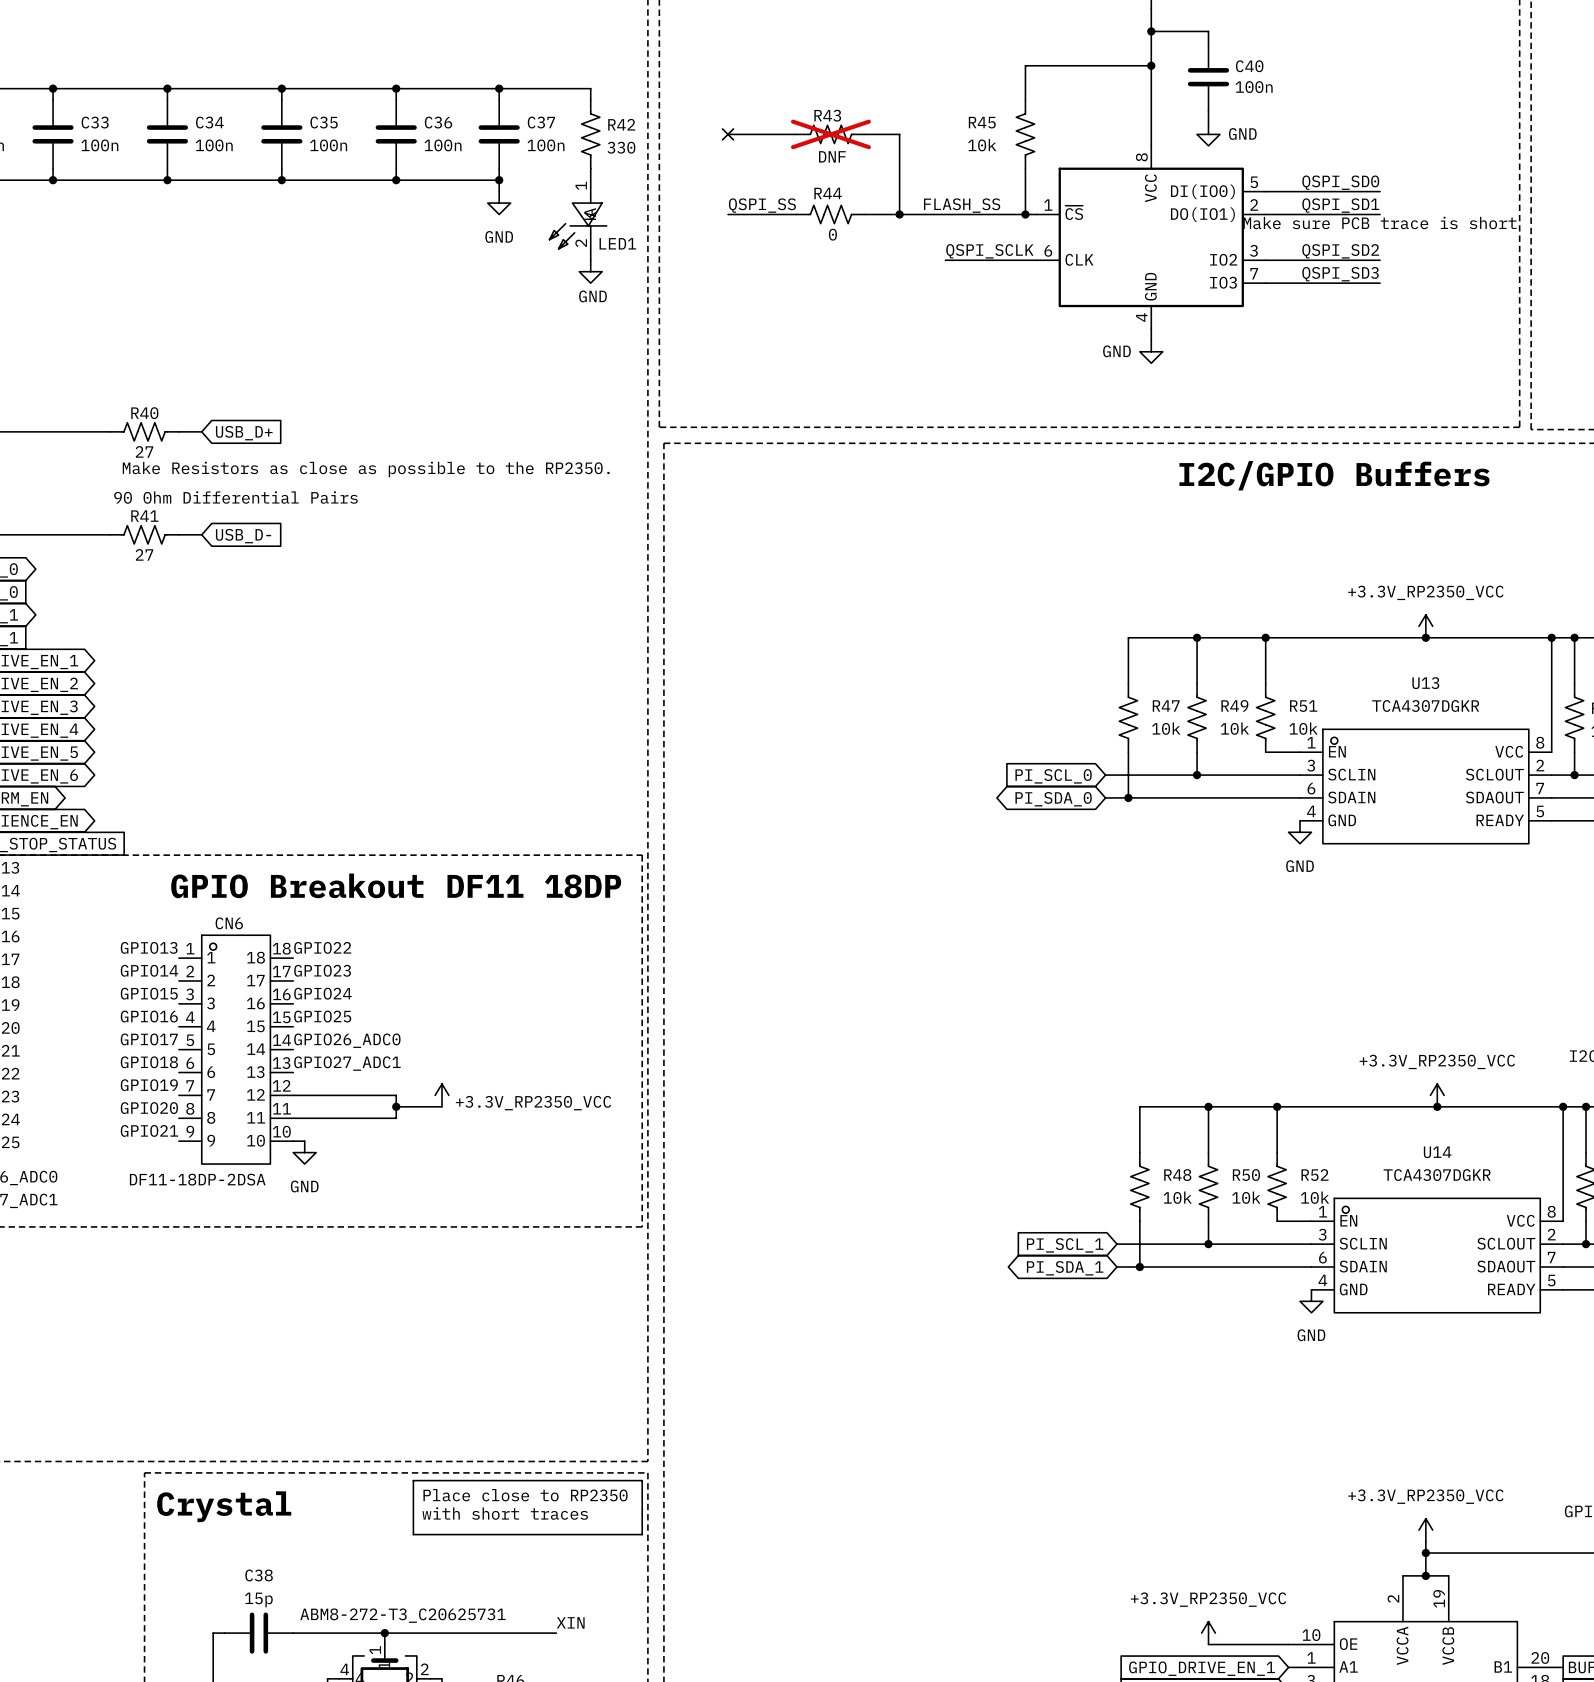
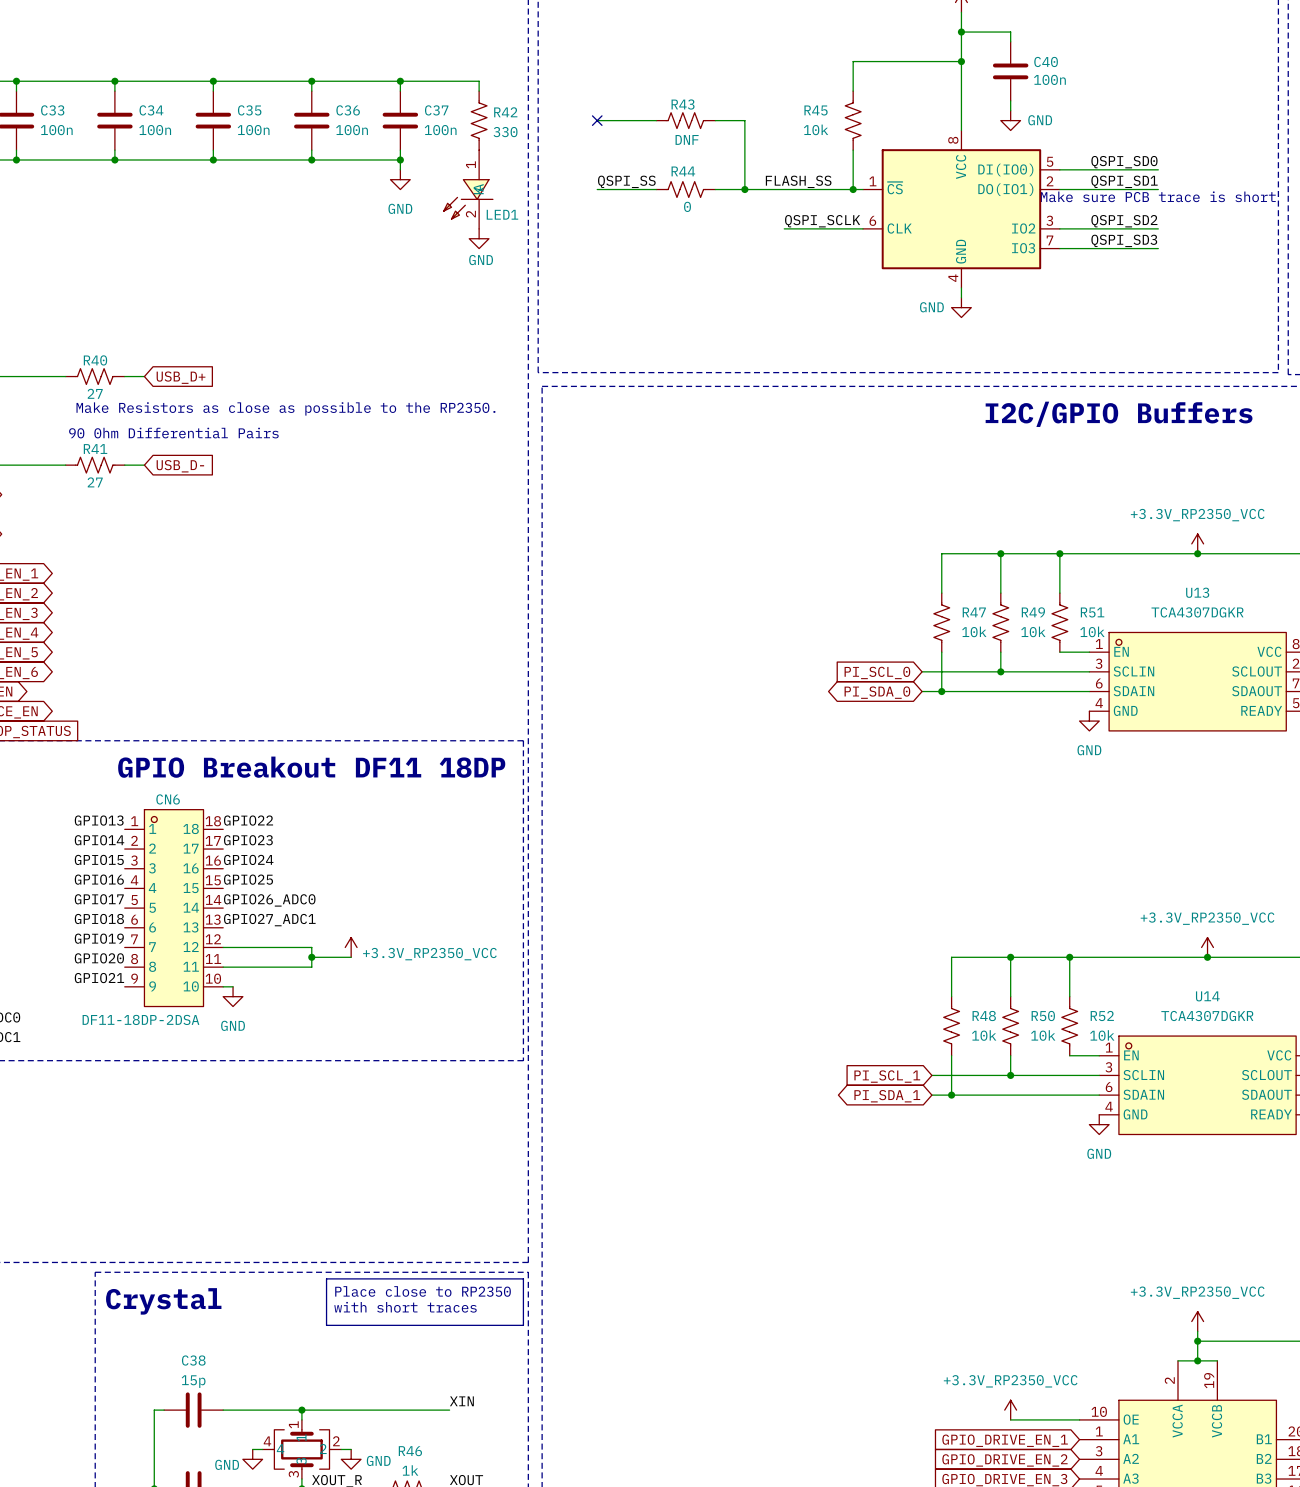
R43 do-not-place cross: (830, 134) -> none
part value: ABM8-272-T3_C20625731 (402, 1615) -> none

